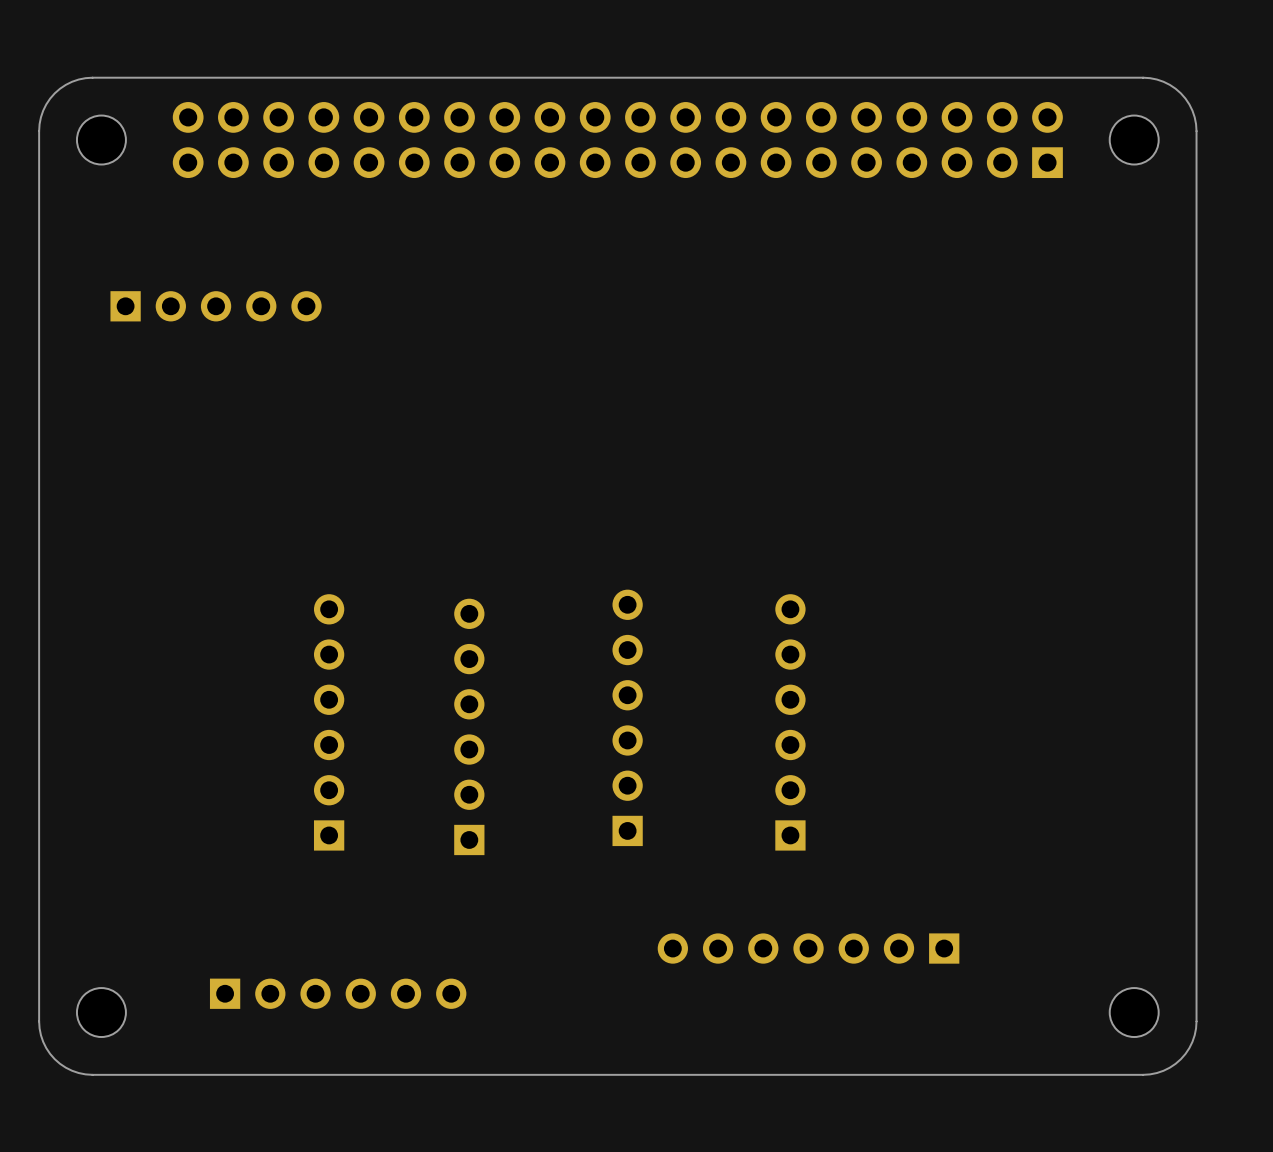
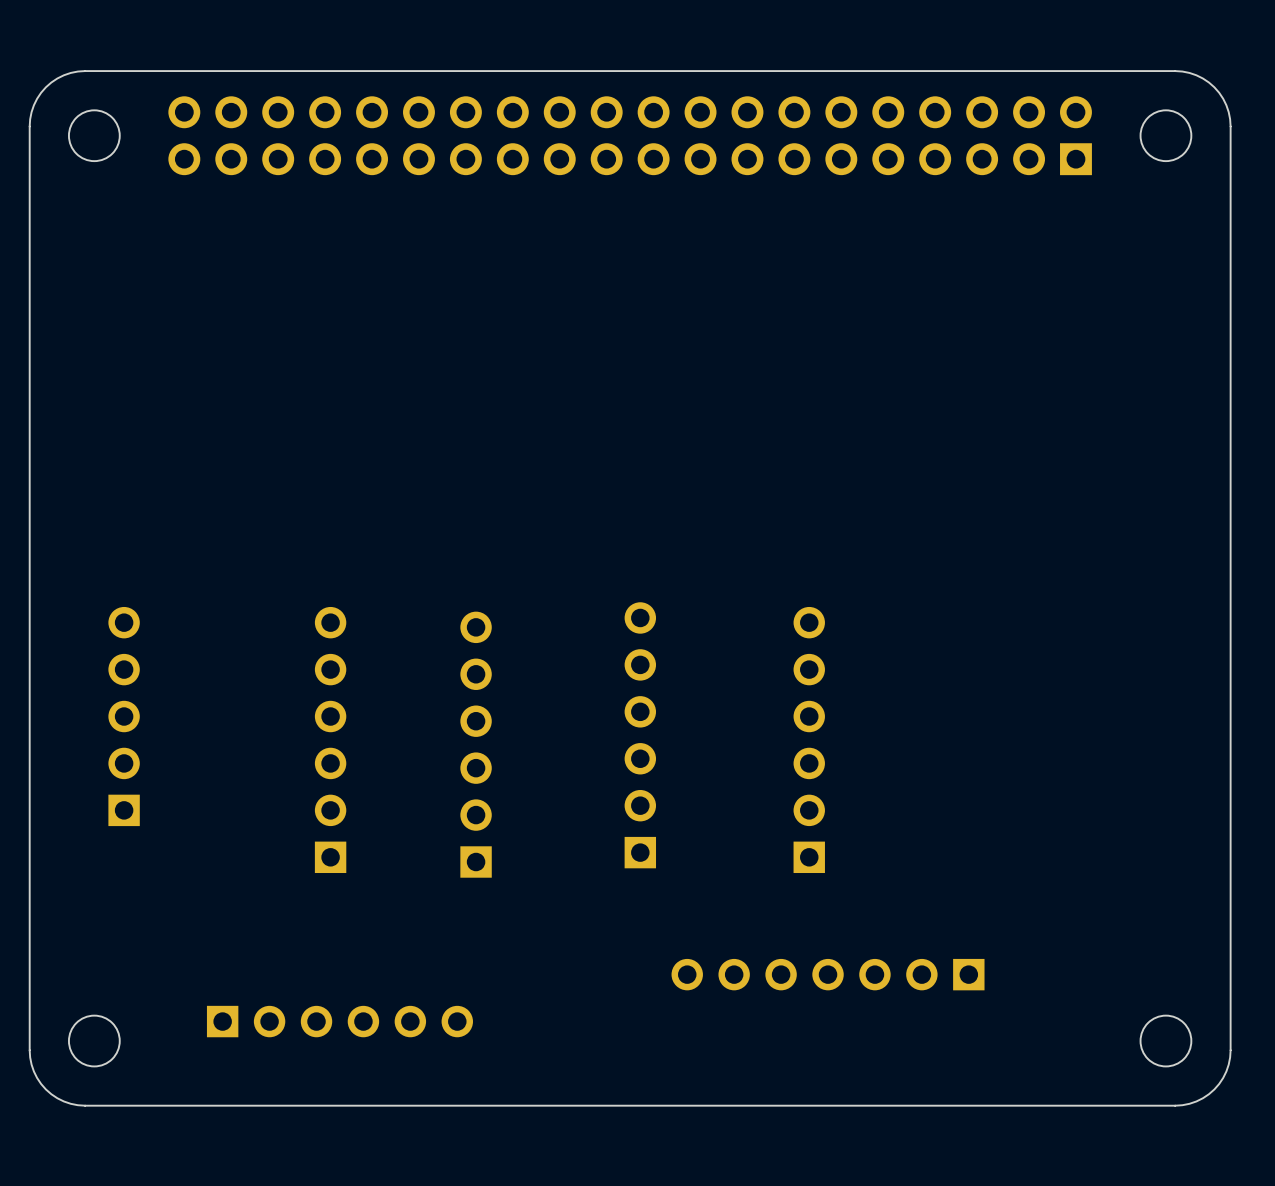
part rotation: 0° (216, 306) -> 90° counterclockwise (124, 716)
part position: (216, 306) -> (124, 716)

